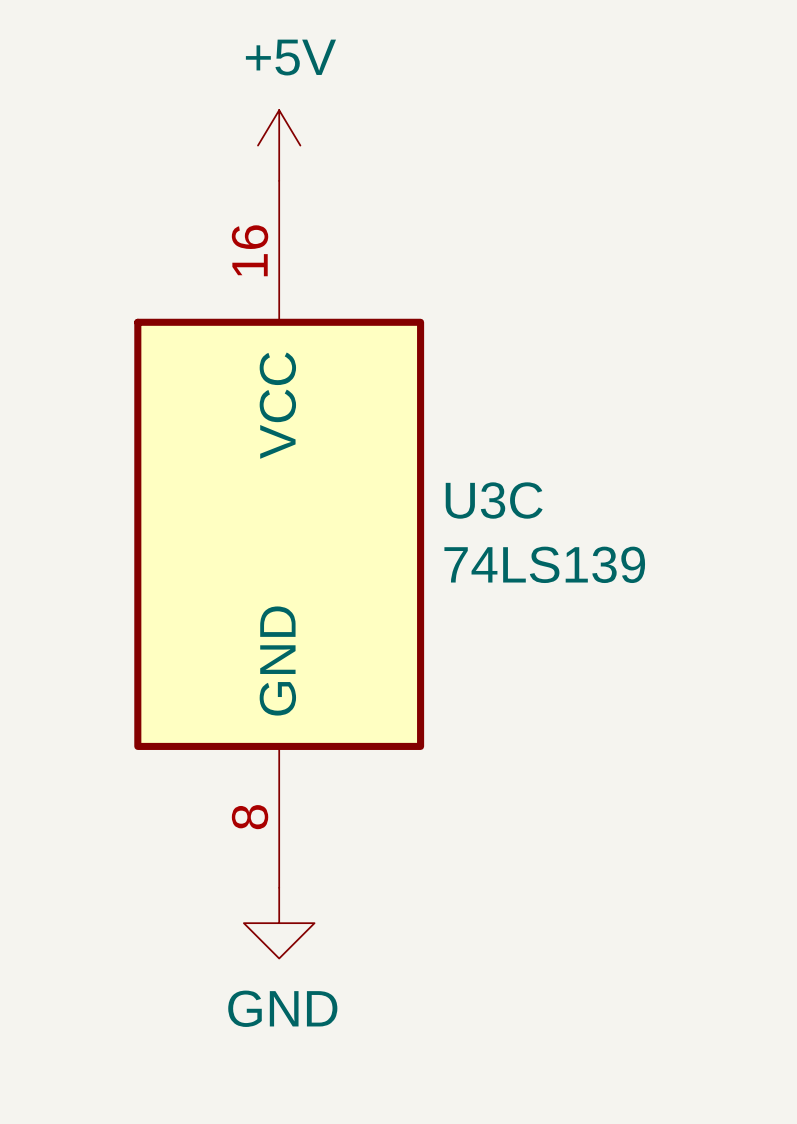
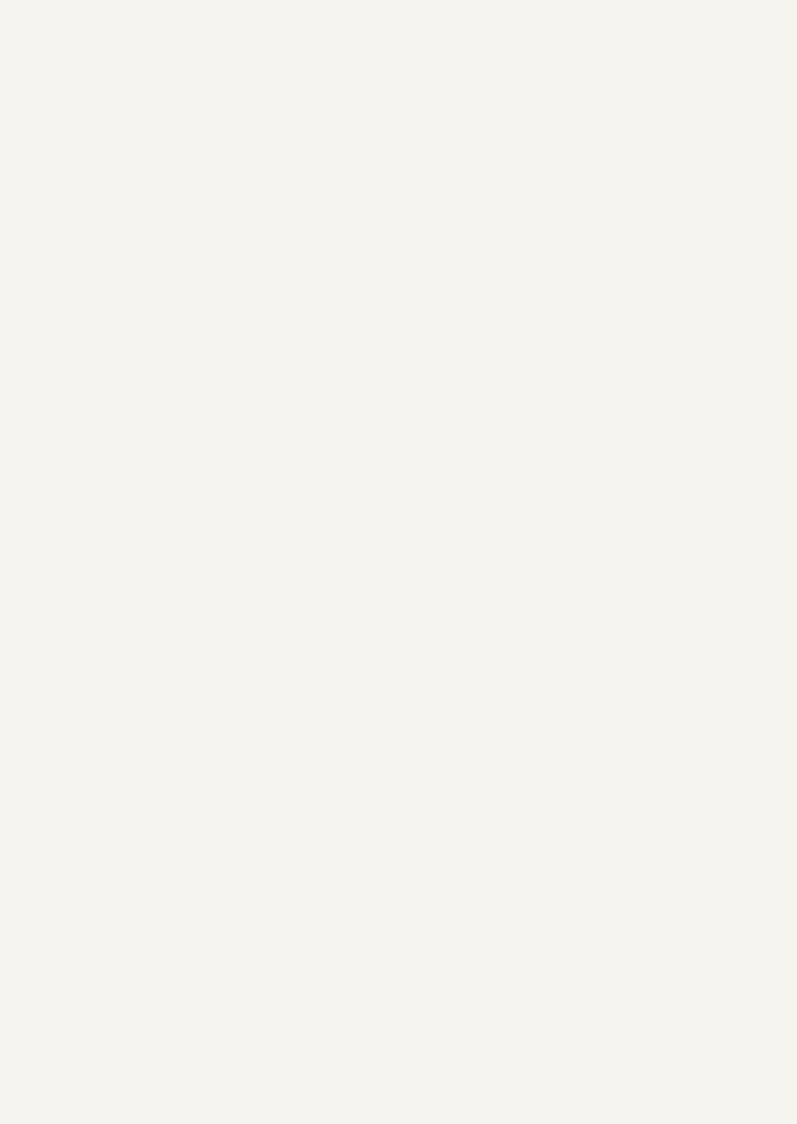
power symbol: +5V (279, 145) -> none
U3C: 74LS139 (279, 534) -> none
power symbol: GND (279, 923) -> none

